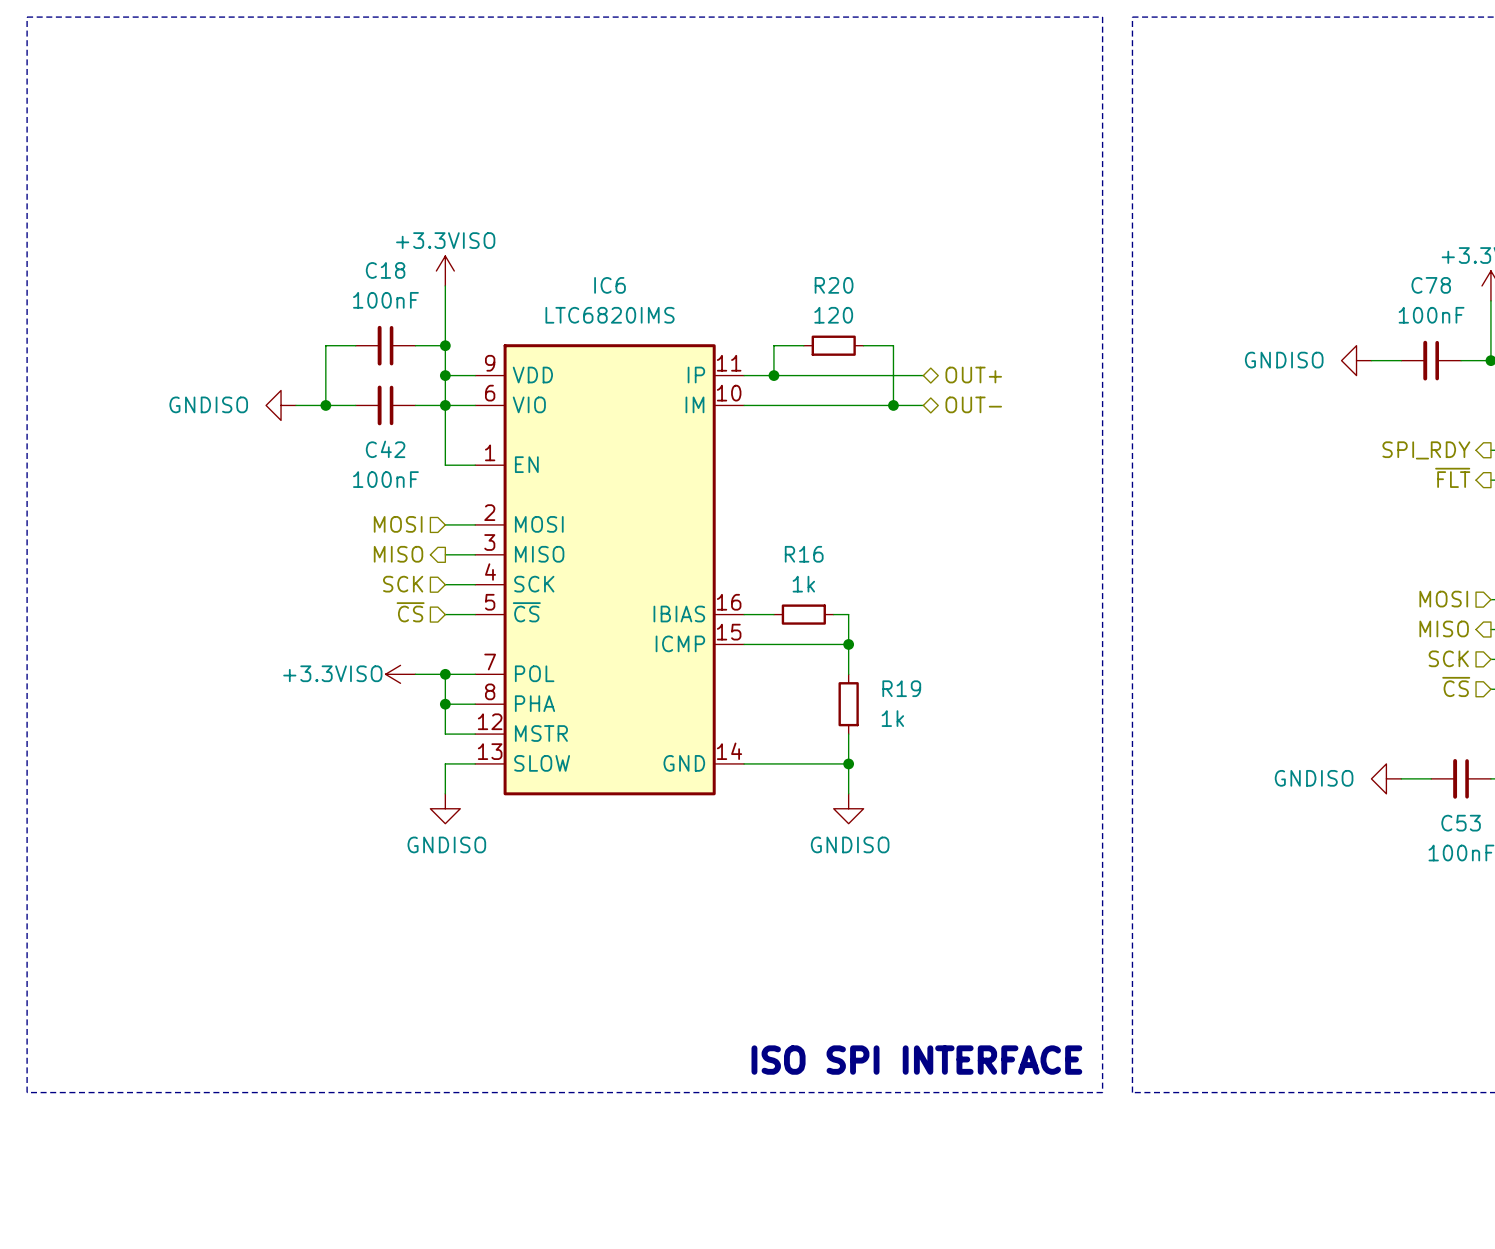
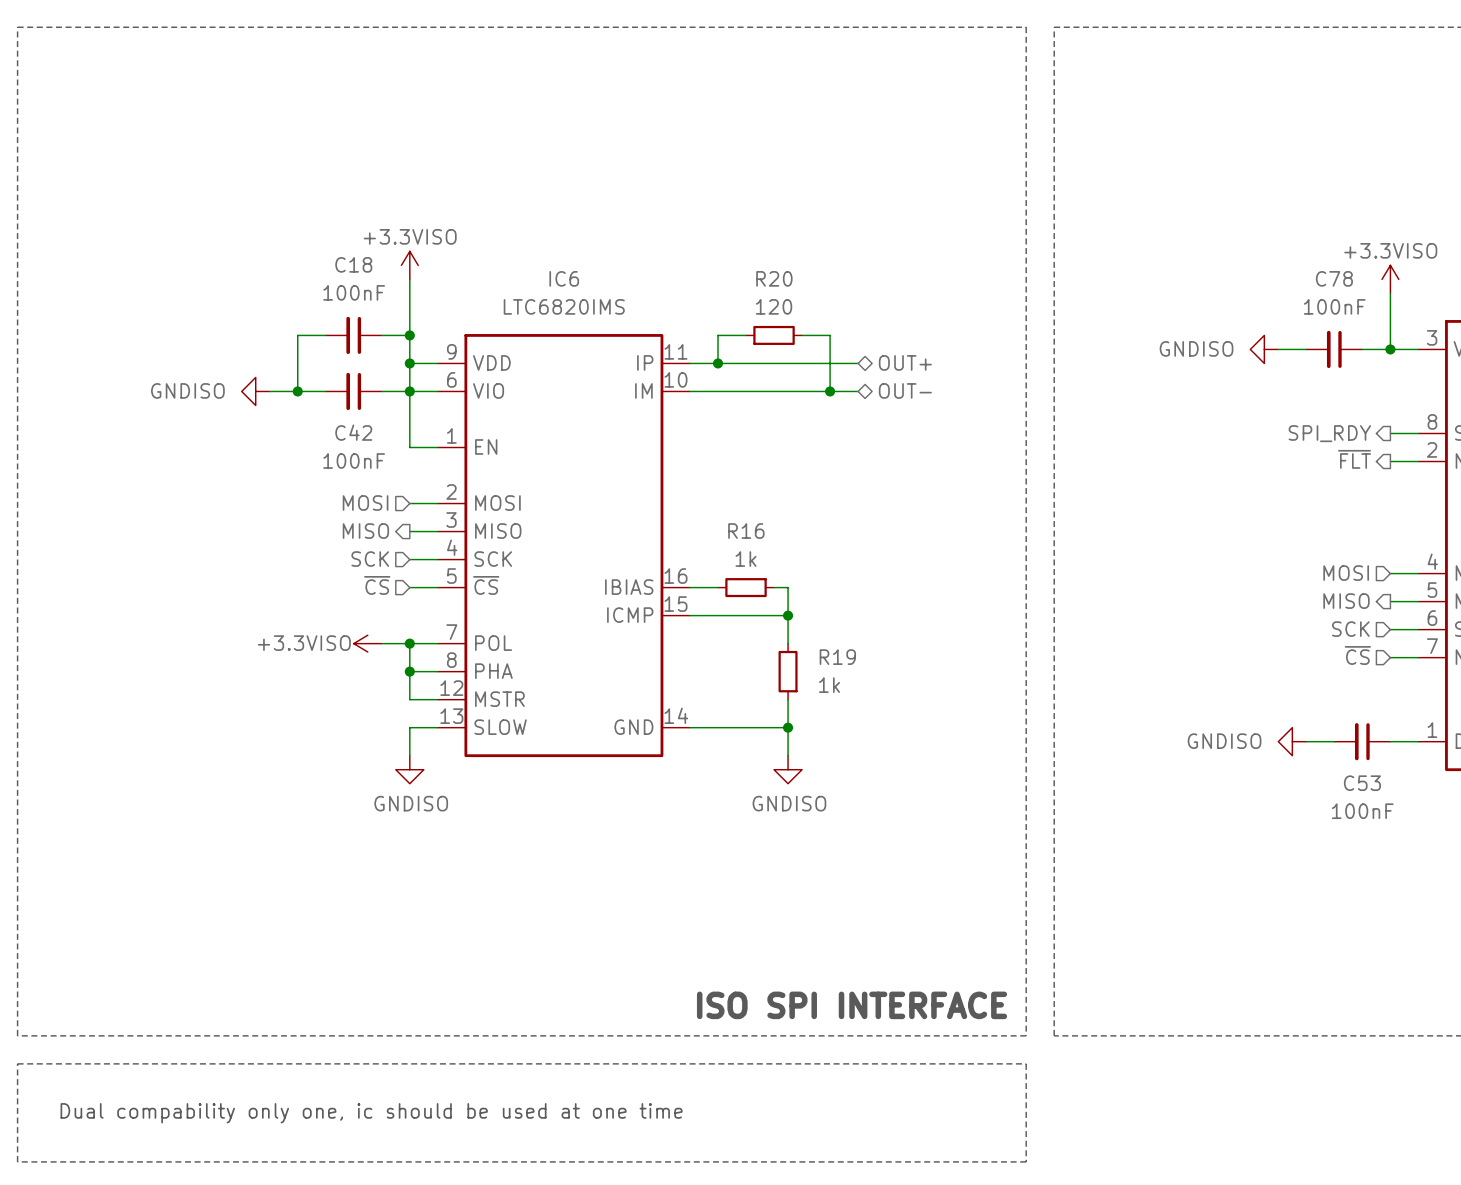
line: none -> (17, 1063) (1026, 1063) (1026, 1161) (17, 1161) (17, 1063)
text: none -> Dual compability only one, ic should be used at one time (371, 1113)

